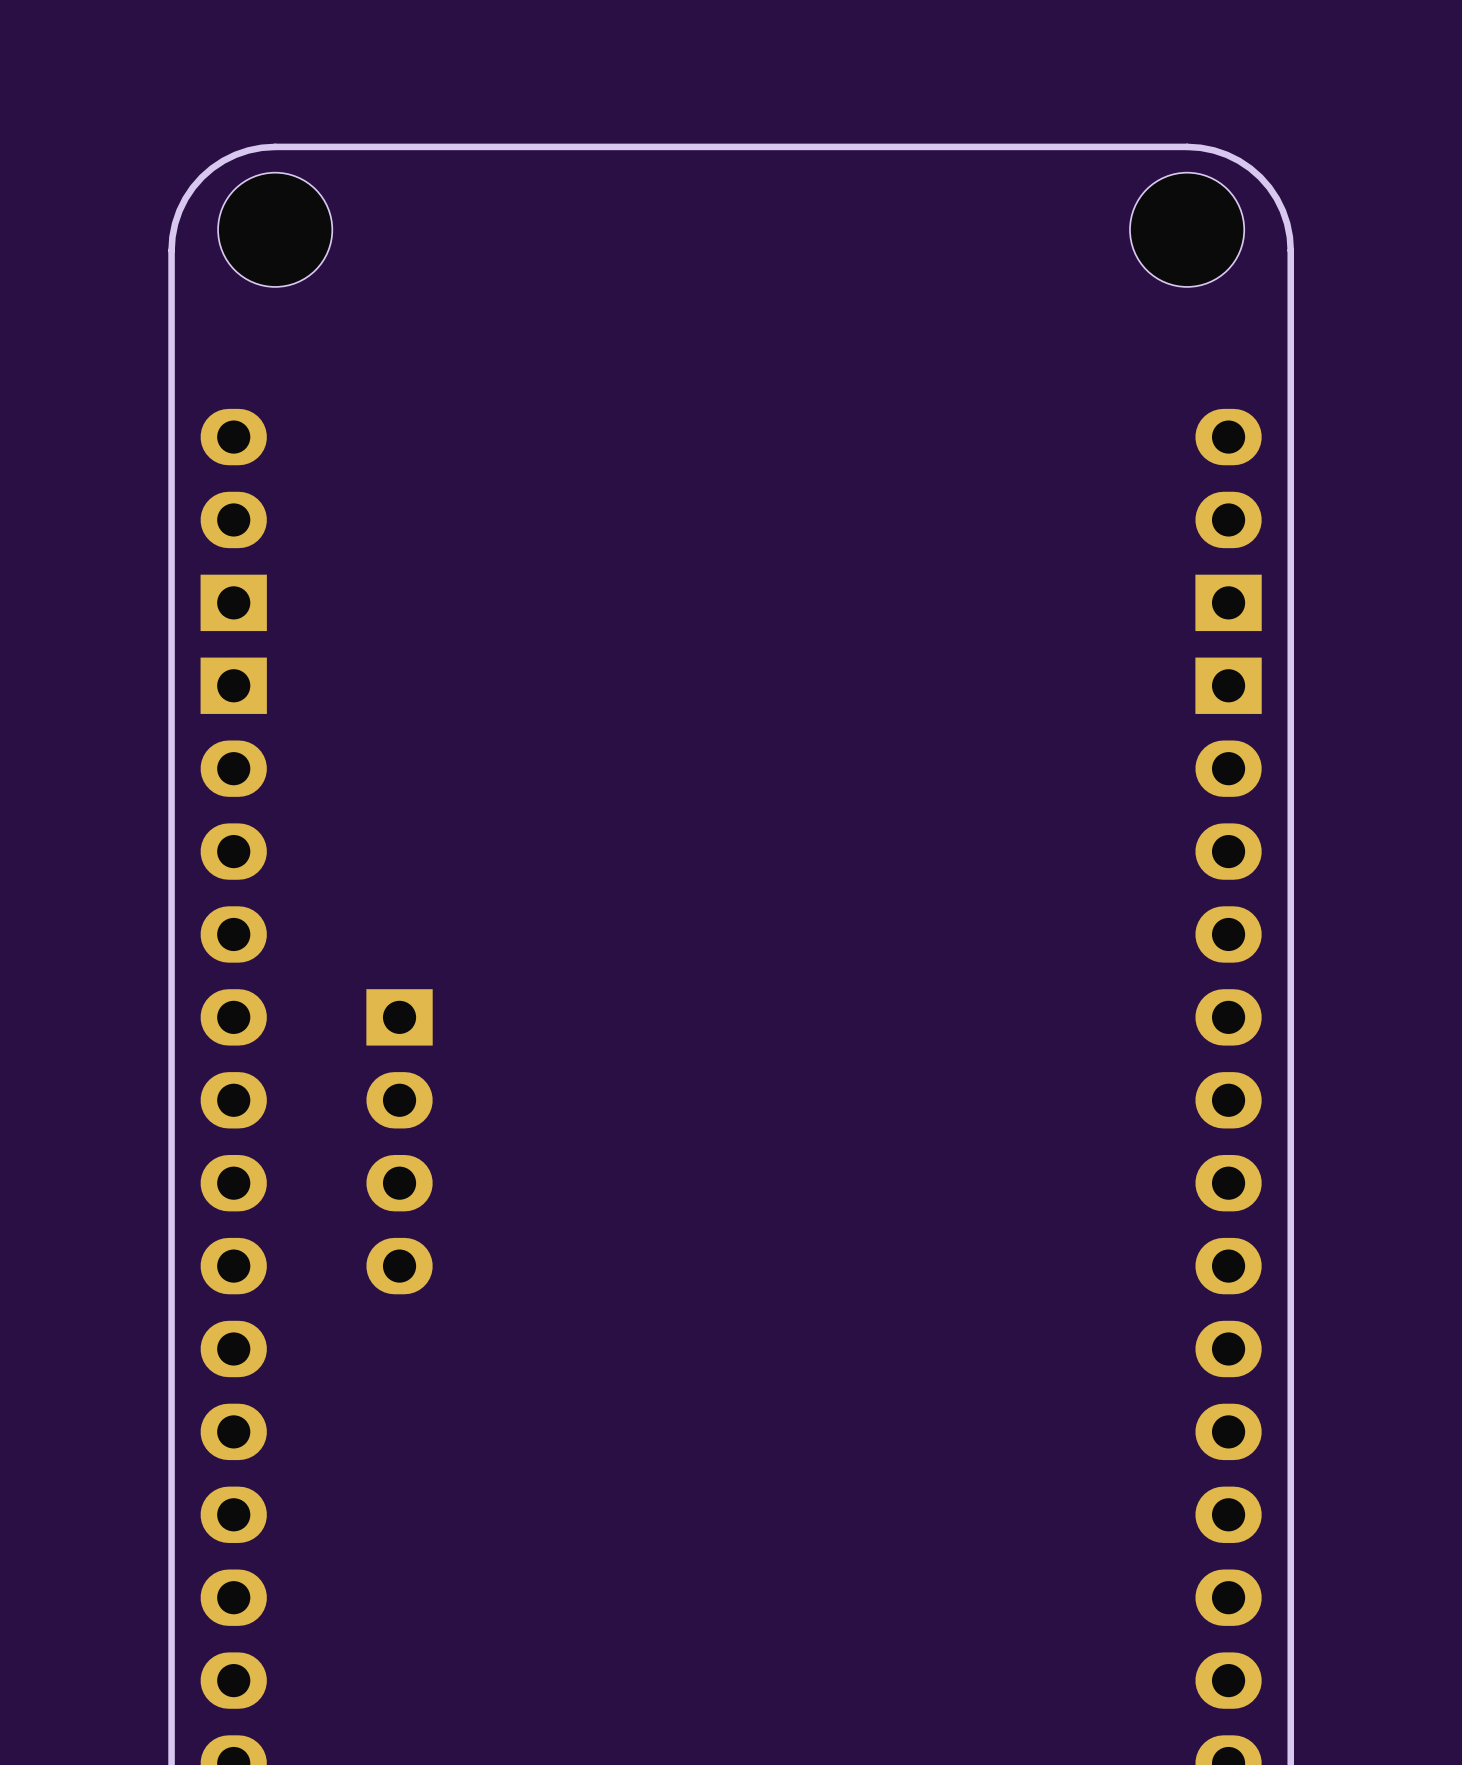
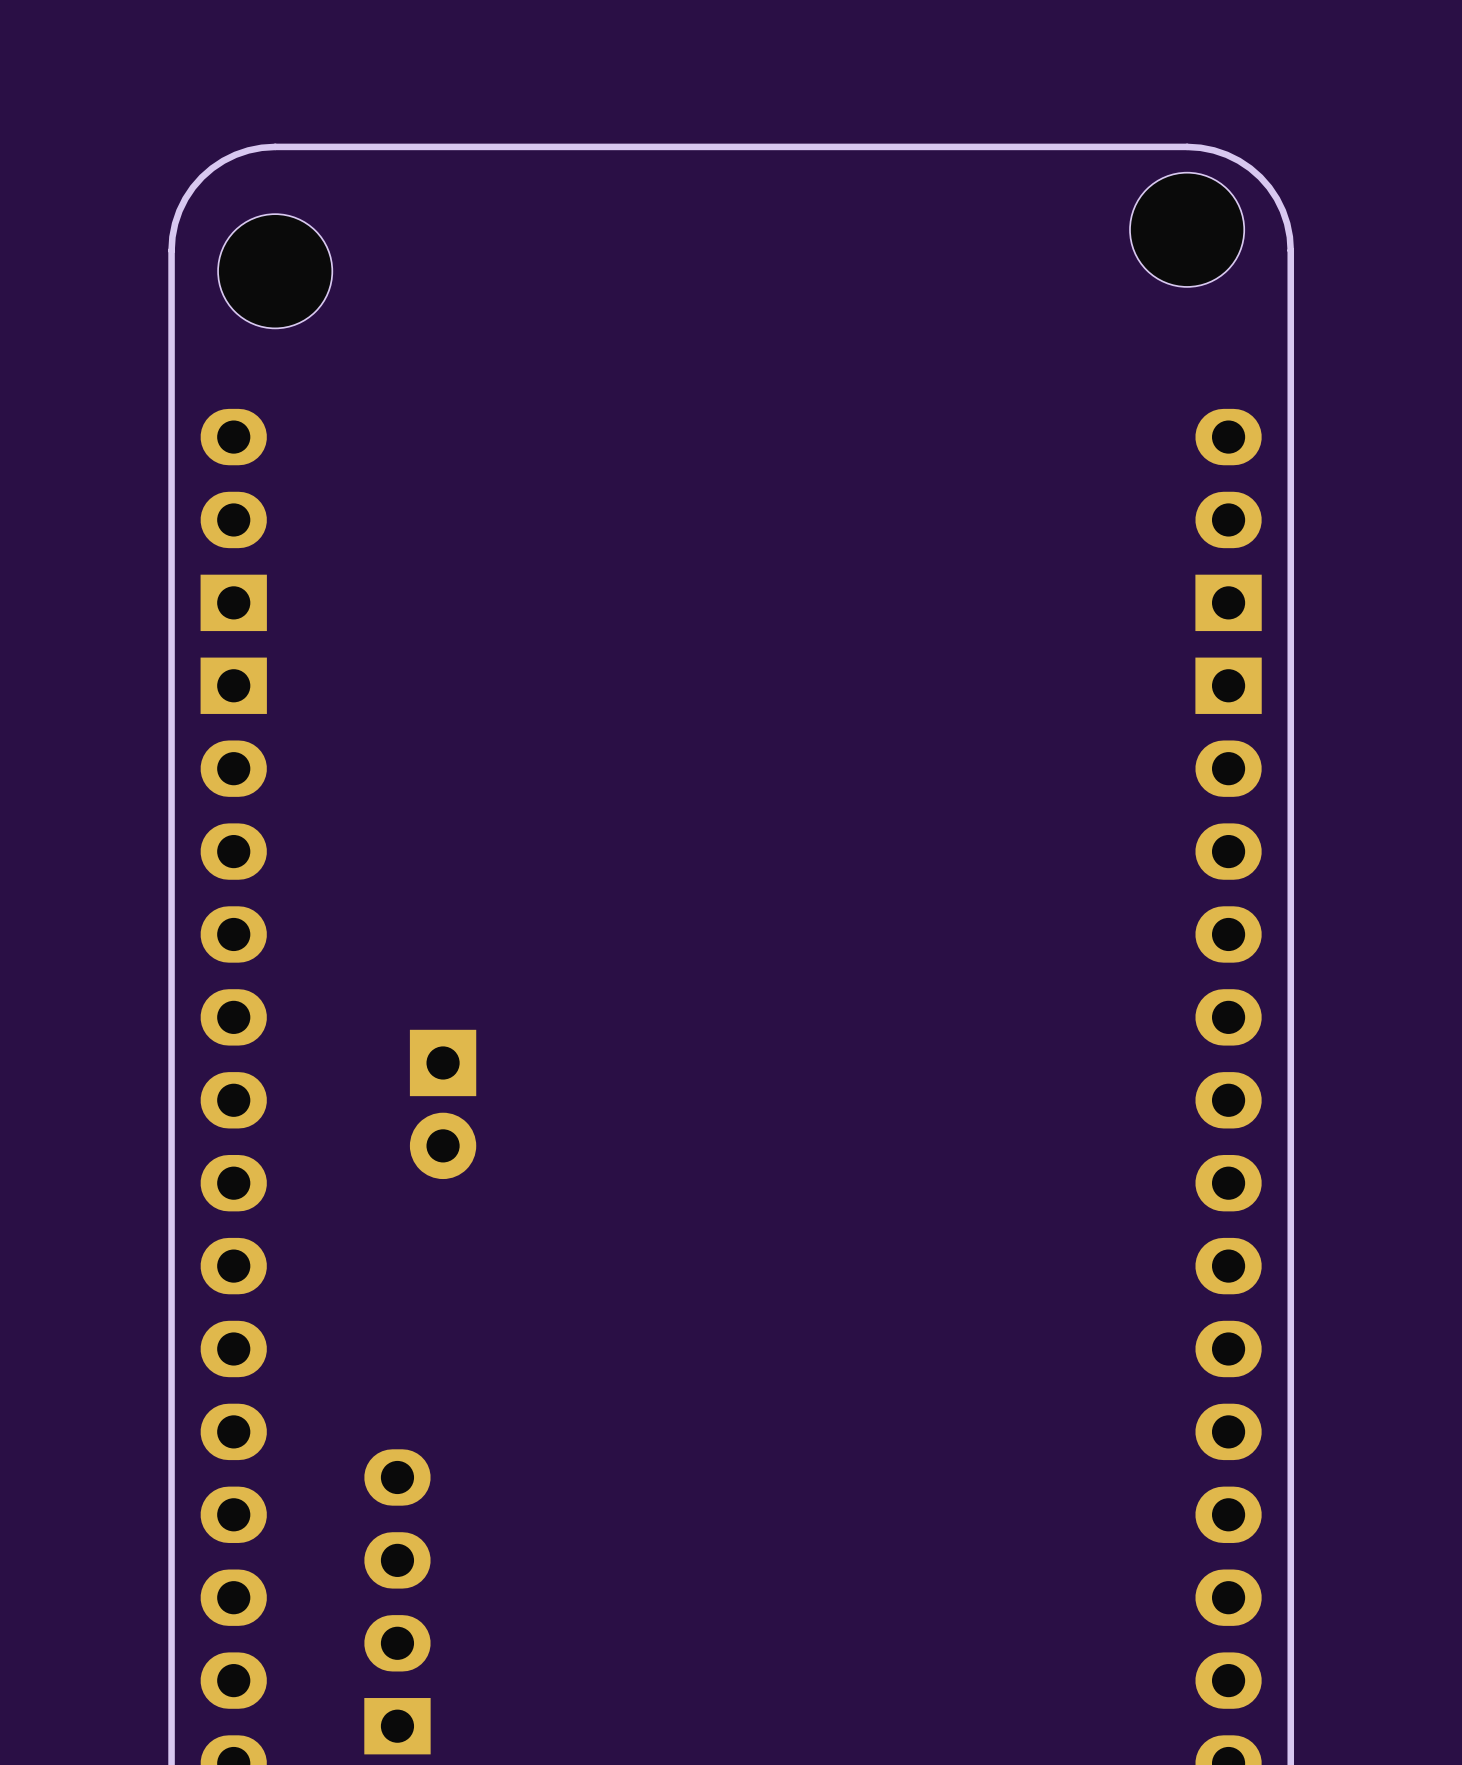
part position: (275, 229) -> (275, 271)
part: none -> (443, 1104)
part rotation: 0° (399, 1141) -> 180° (397, 1601)
part position: (399, 1141) -> (397, 1601)

